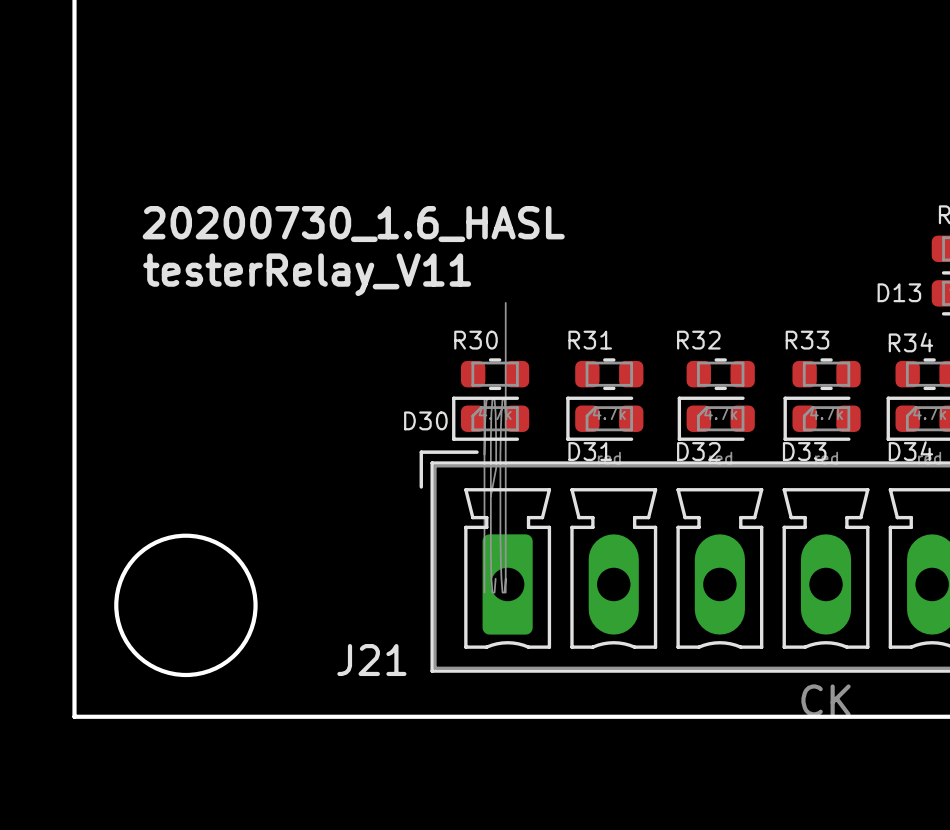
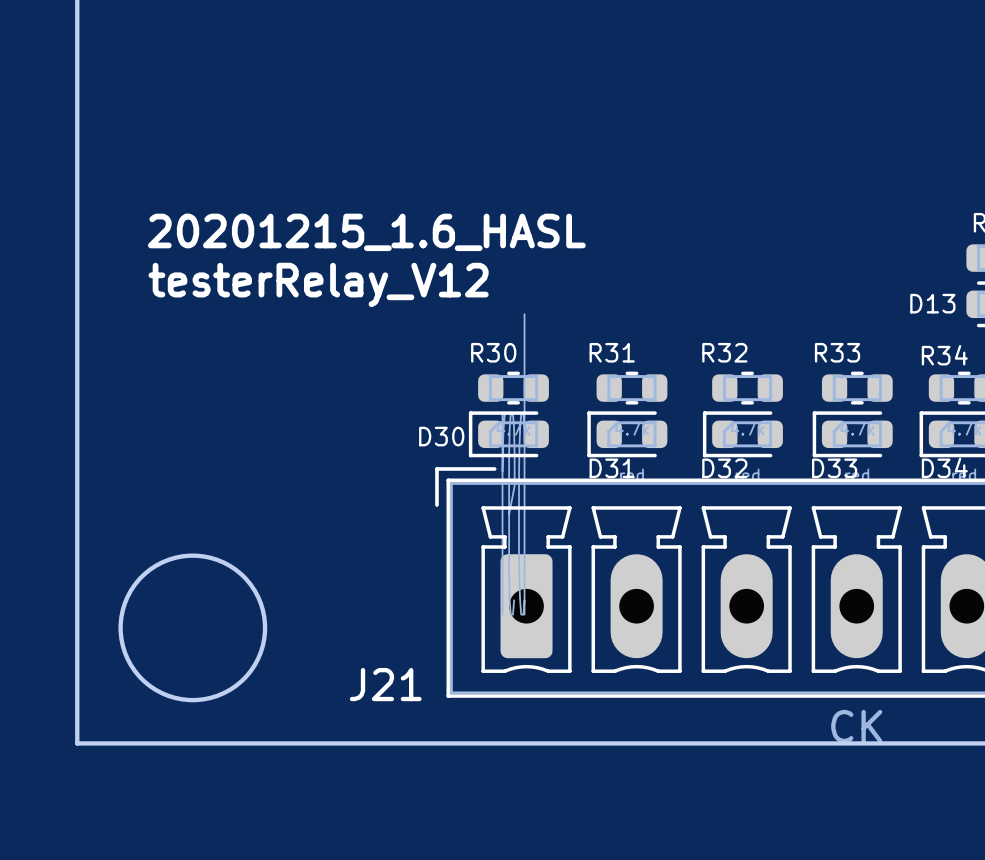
text: 20200730_1.6_HASL (353, 224) -> 20201215_1.6_HASL (366, 232)
text: testerRelay_V11 (307, 274) -> testerRelay_V12 (318, 284)

